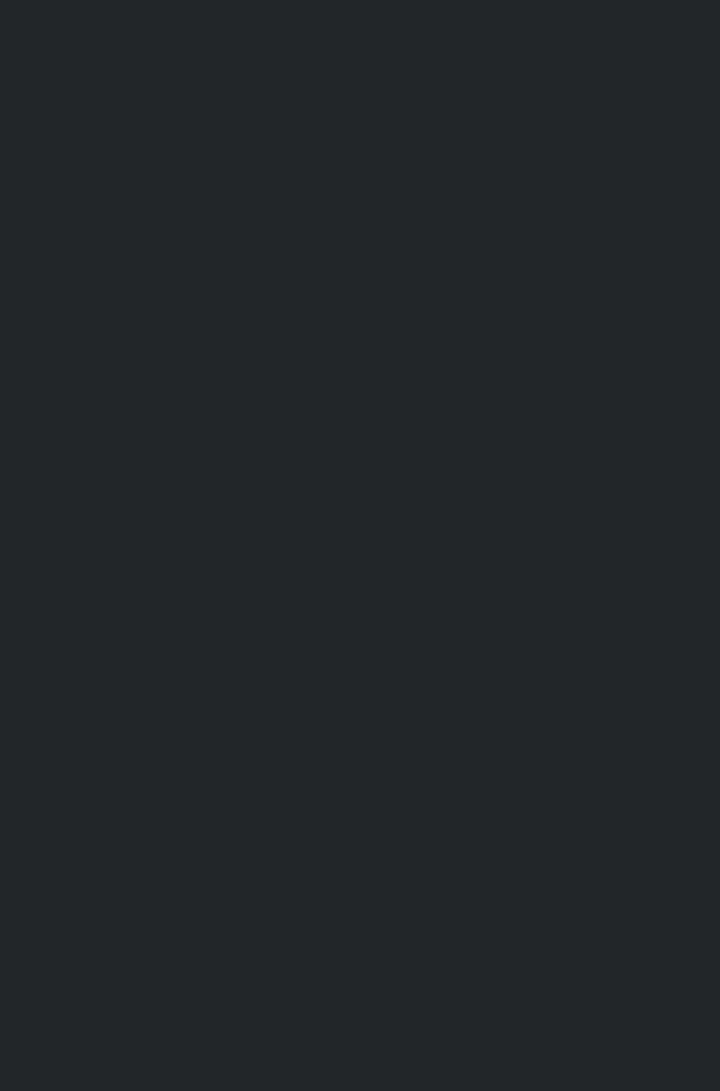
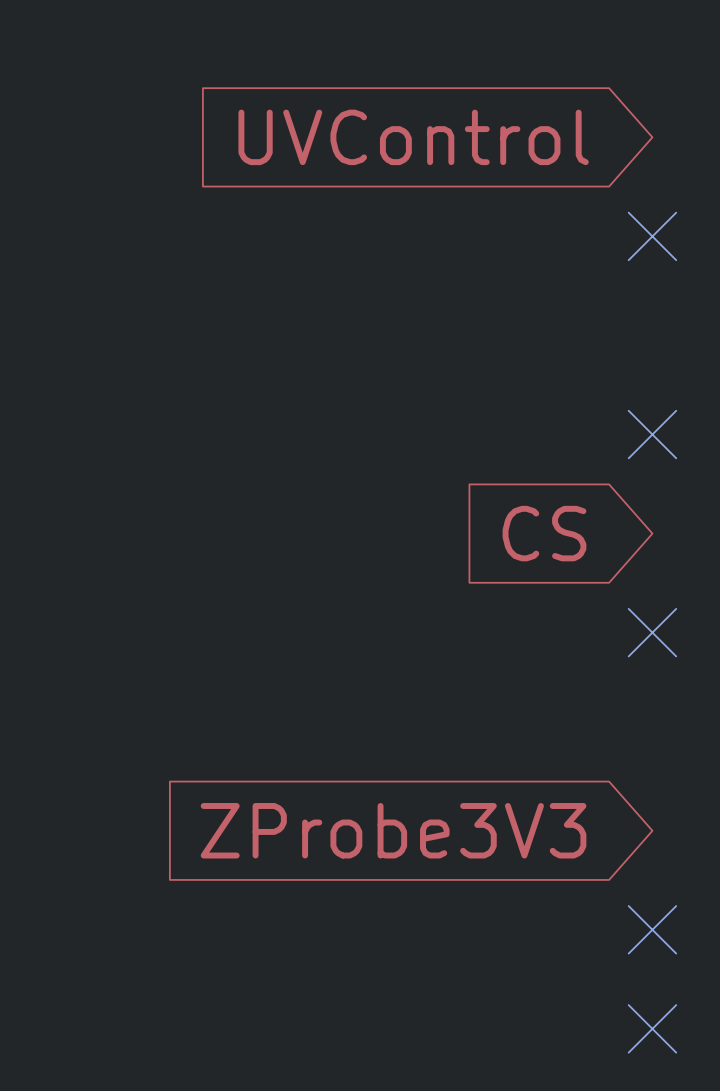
global label: none -> UVControl (413, 137)
no-connect mark: none -> (652, 236)
no-connect mark: none -> (652, 434)
global label: none -> CS (544, 533)
no-connect mark: none -> (652, 632)
global label: none -> ZProbe3V3 (393, 830)
no-connect mark: none -> (652, 929)
no-connect mark: none -> (652, 1028)

